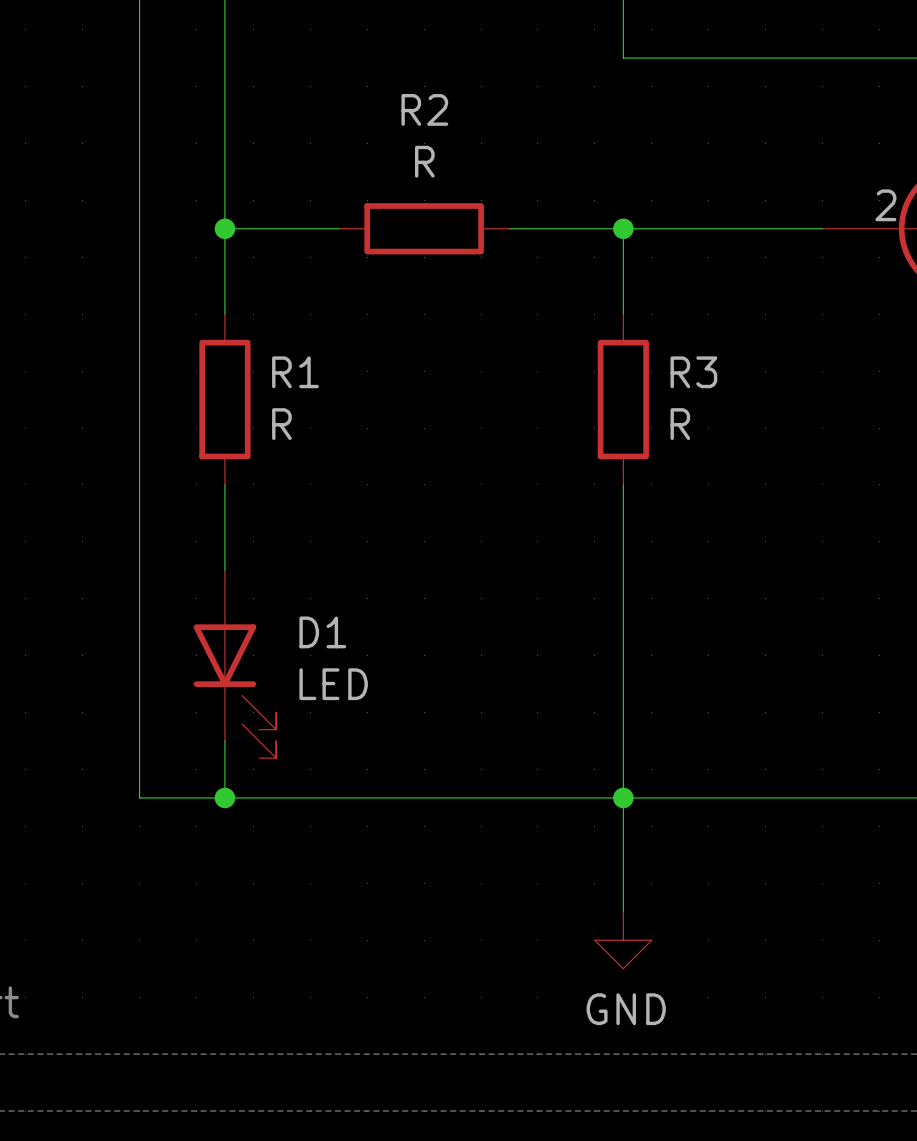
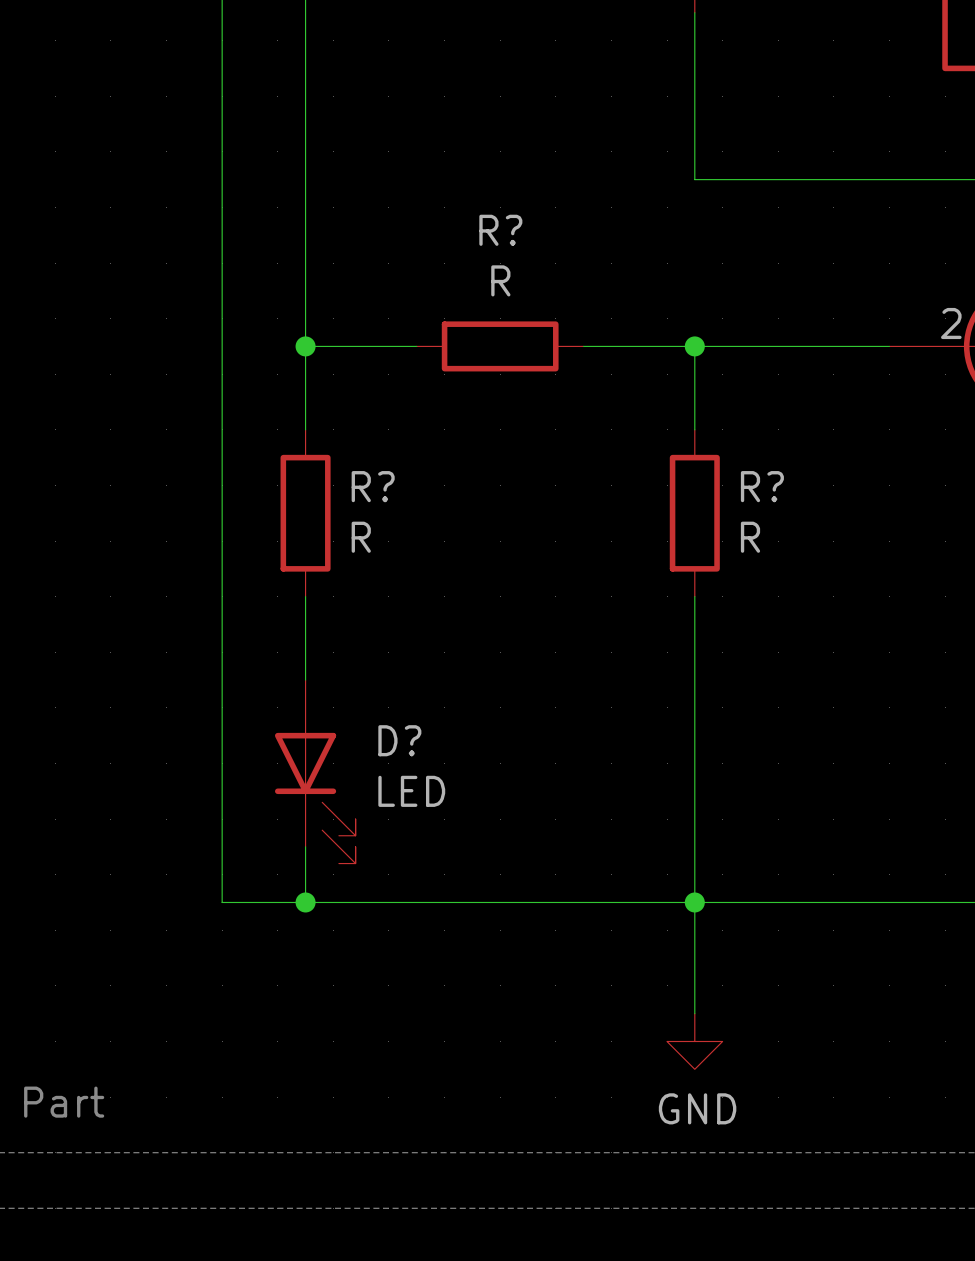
R2 name: R2 (424, 109) -> R? (500, 230)
R1 name: R1 (295, 372) -> R? (373, 486)
R3 name: R3 (693, 372) -> R? (762, 486)
D1 name: D1 (322, 632) -> D? (399, 740)

